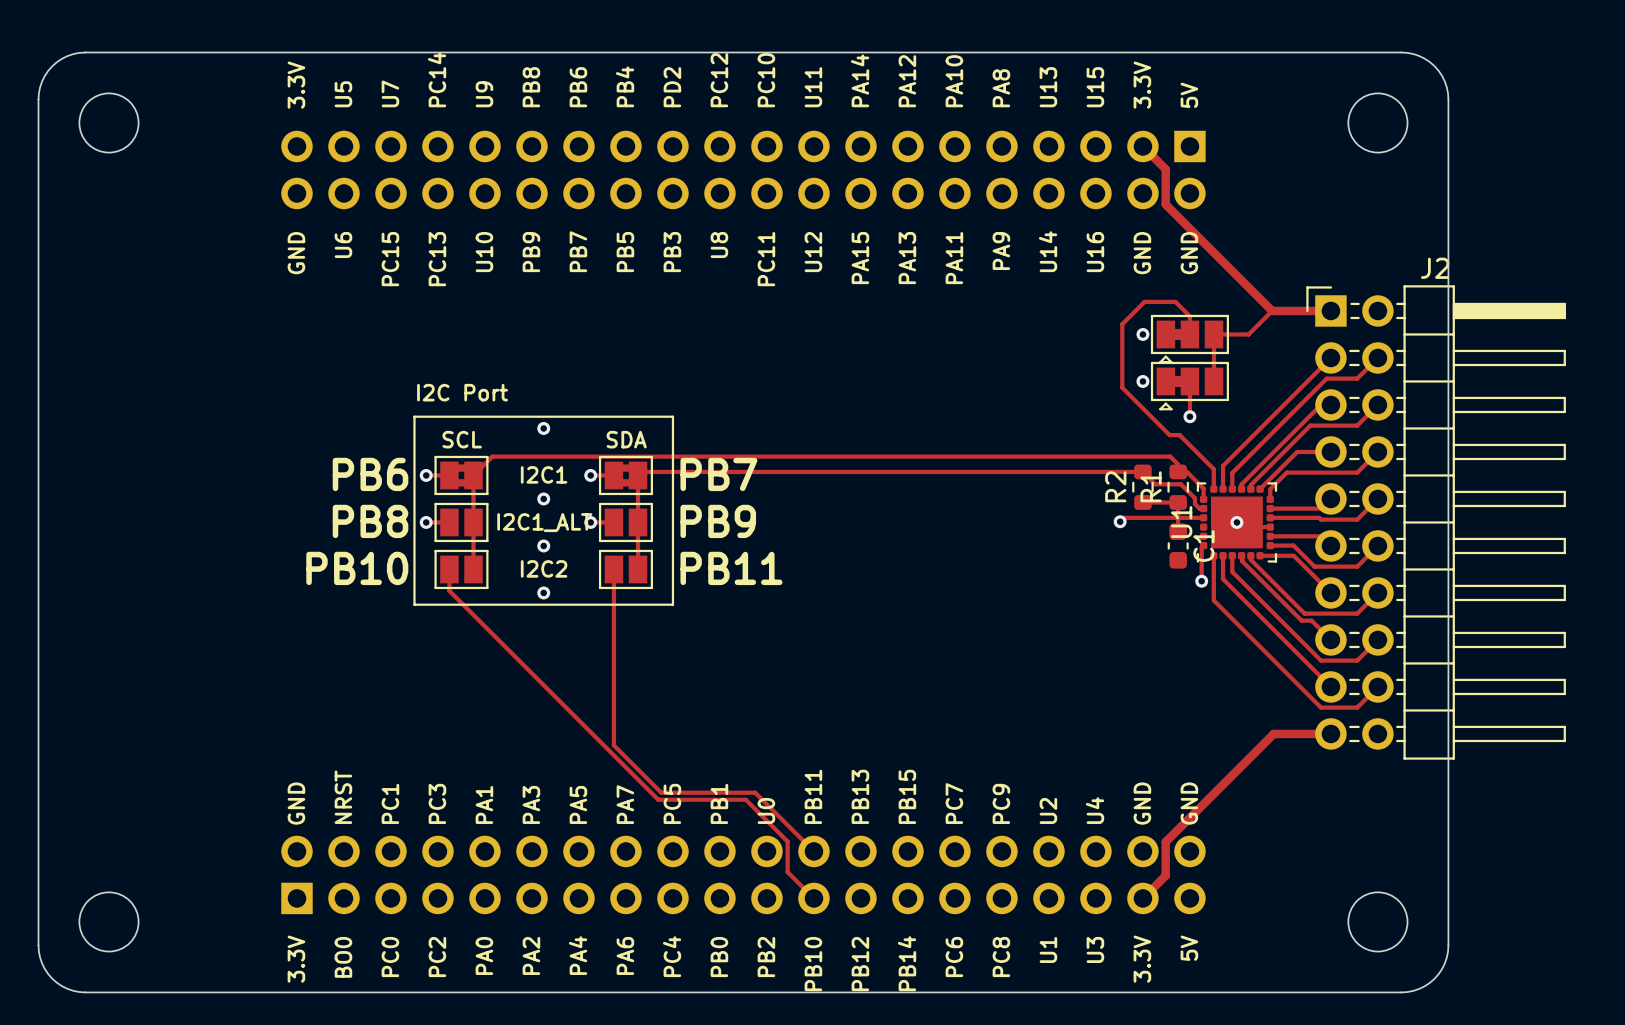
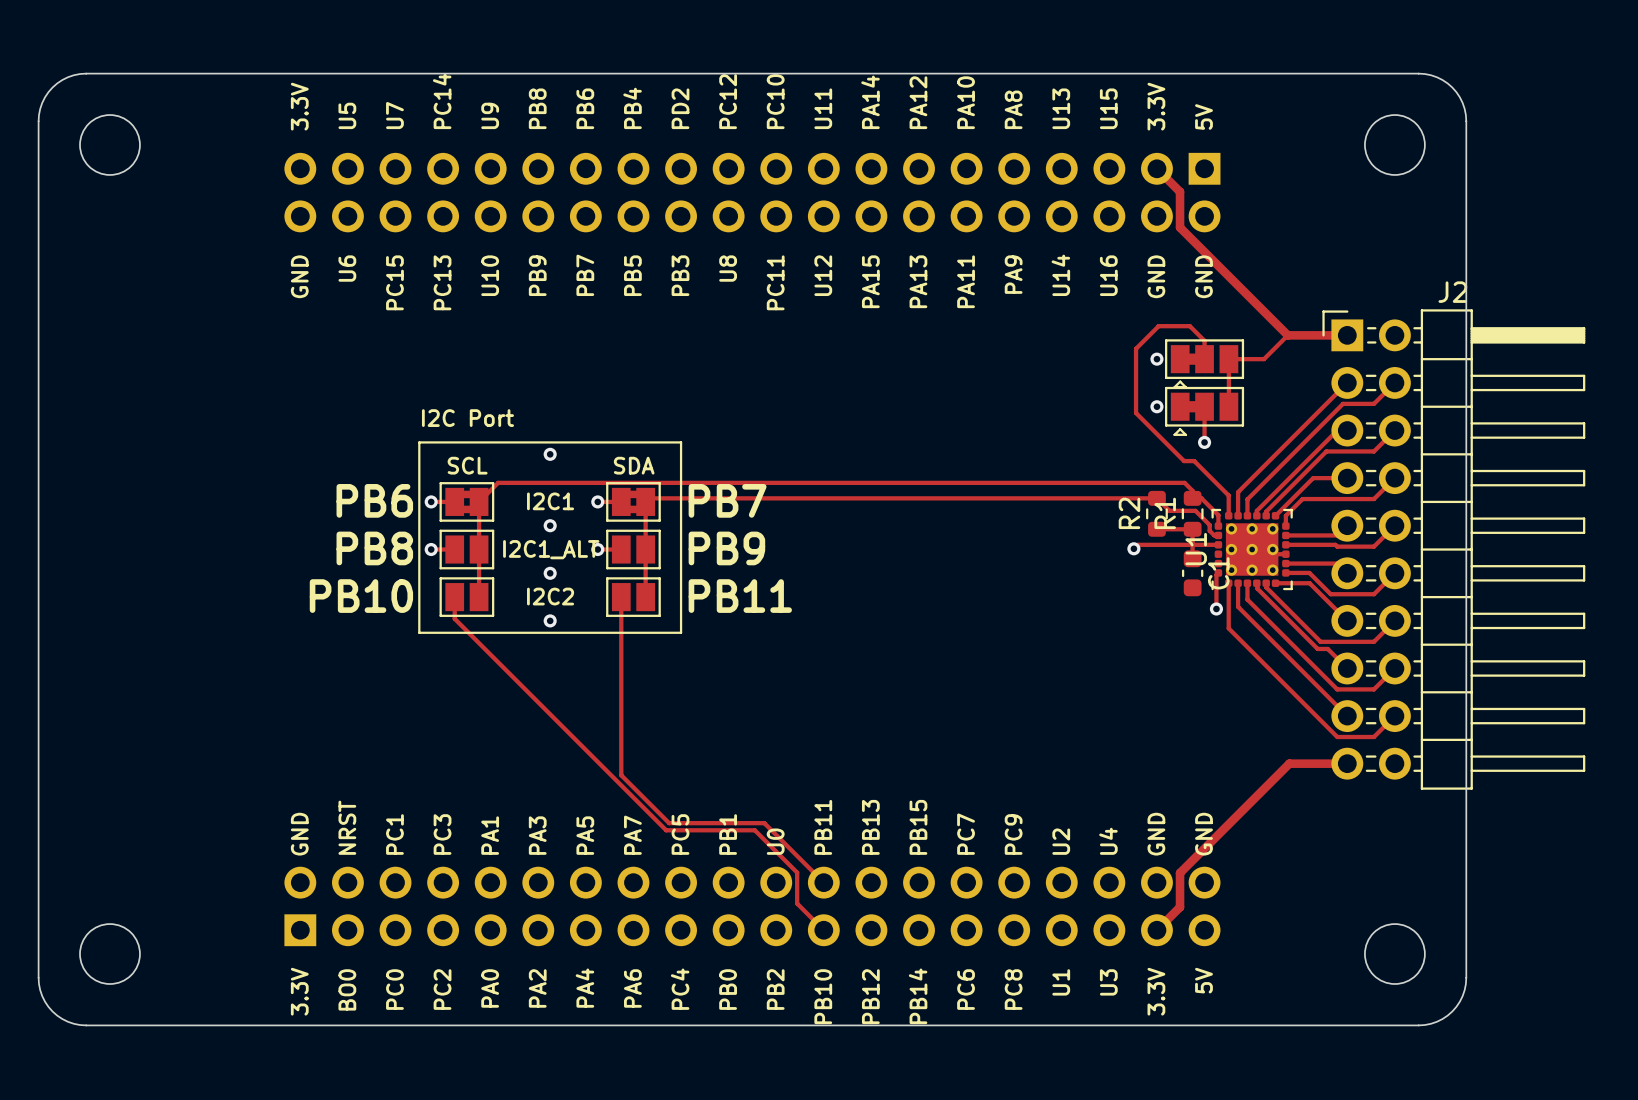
U1 footprint: [1196, 482, 1278, 563] -> [1211, 508, 1293, 591]
via: (1236, 522) -> none

